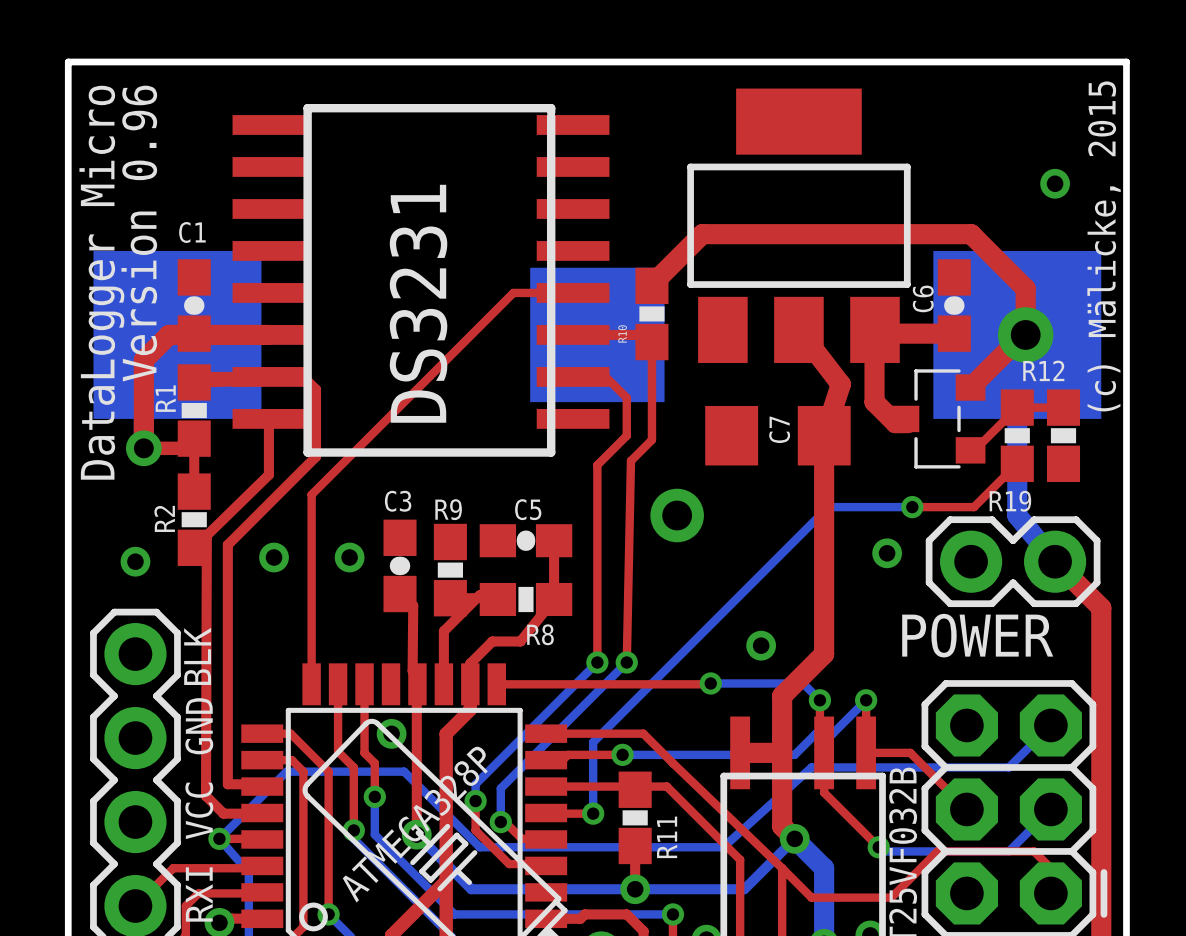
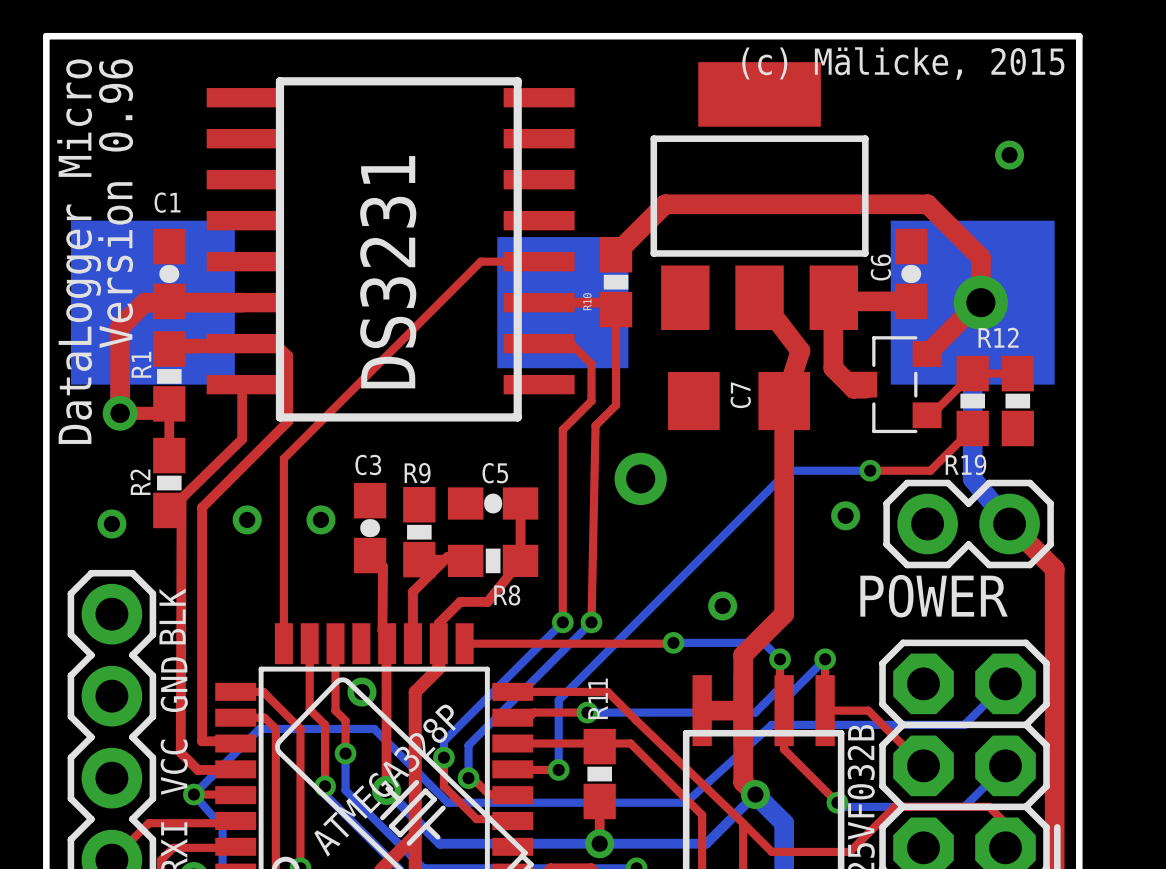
text rotation: 0° (1104, 246) -> 90° clockwise (903, 63)
R11 name position: R11 (667, 837) -> R11 (598, 698)

